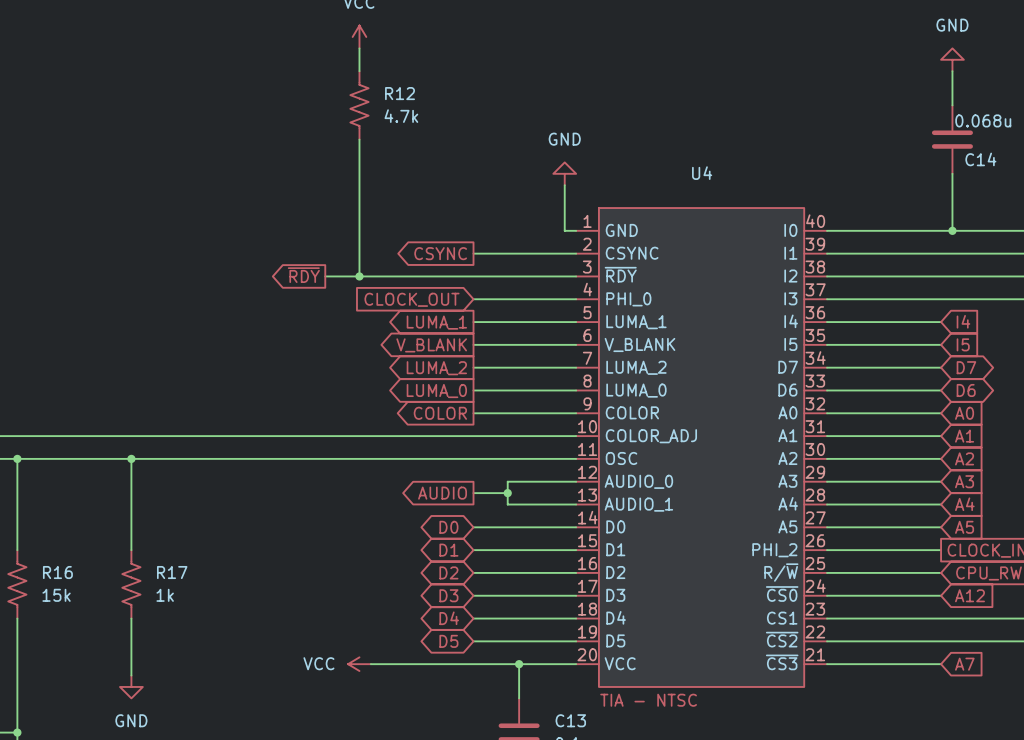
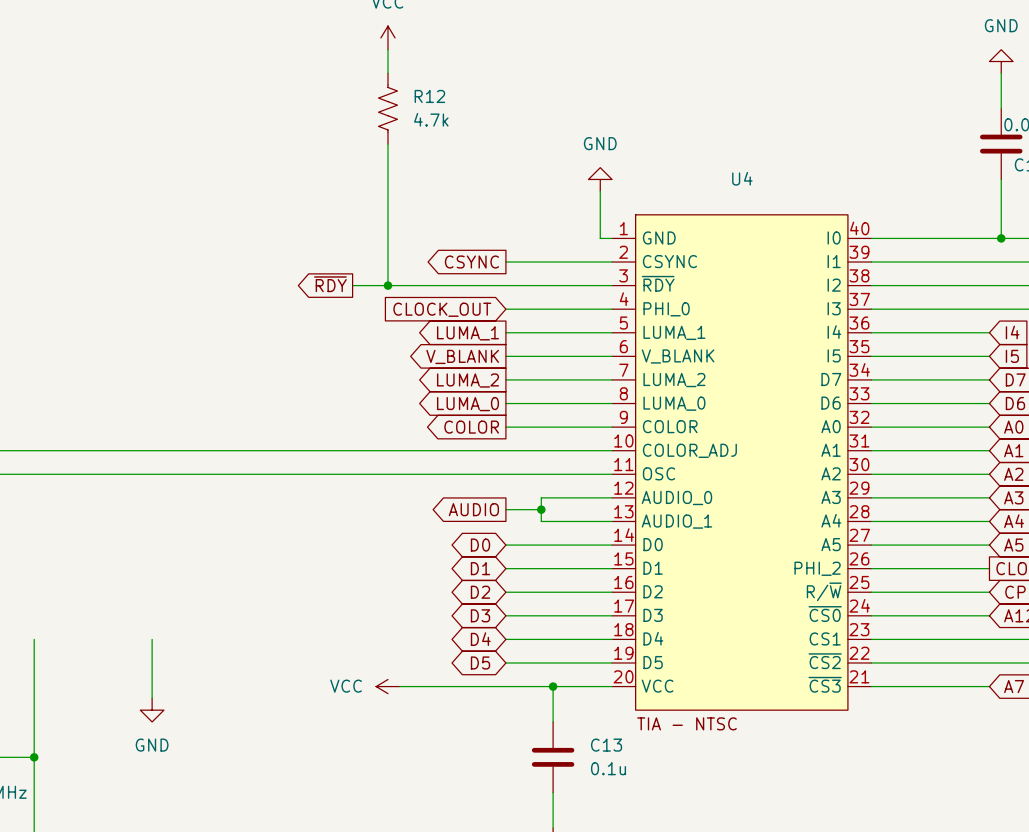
wire: (17, 458) (17, 550) -> none
junction: (17, 458) -> none
wire: (131, 458) (131, 550) -> none
junction: (131, 458) -> none
R16: 15k (17, 584) -> none
R17: 1k (131, 584) -> none

